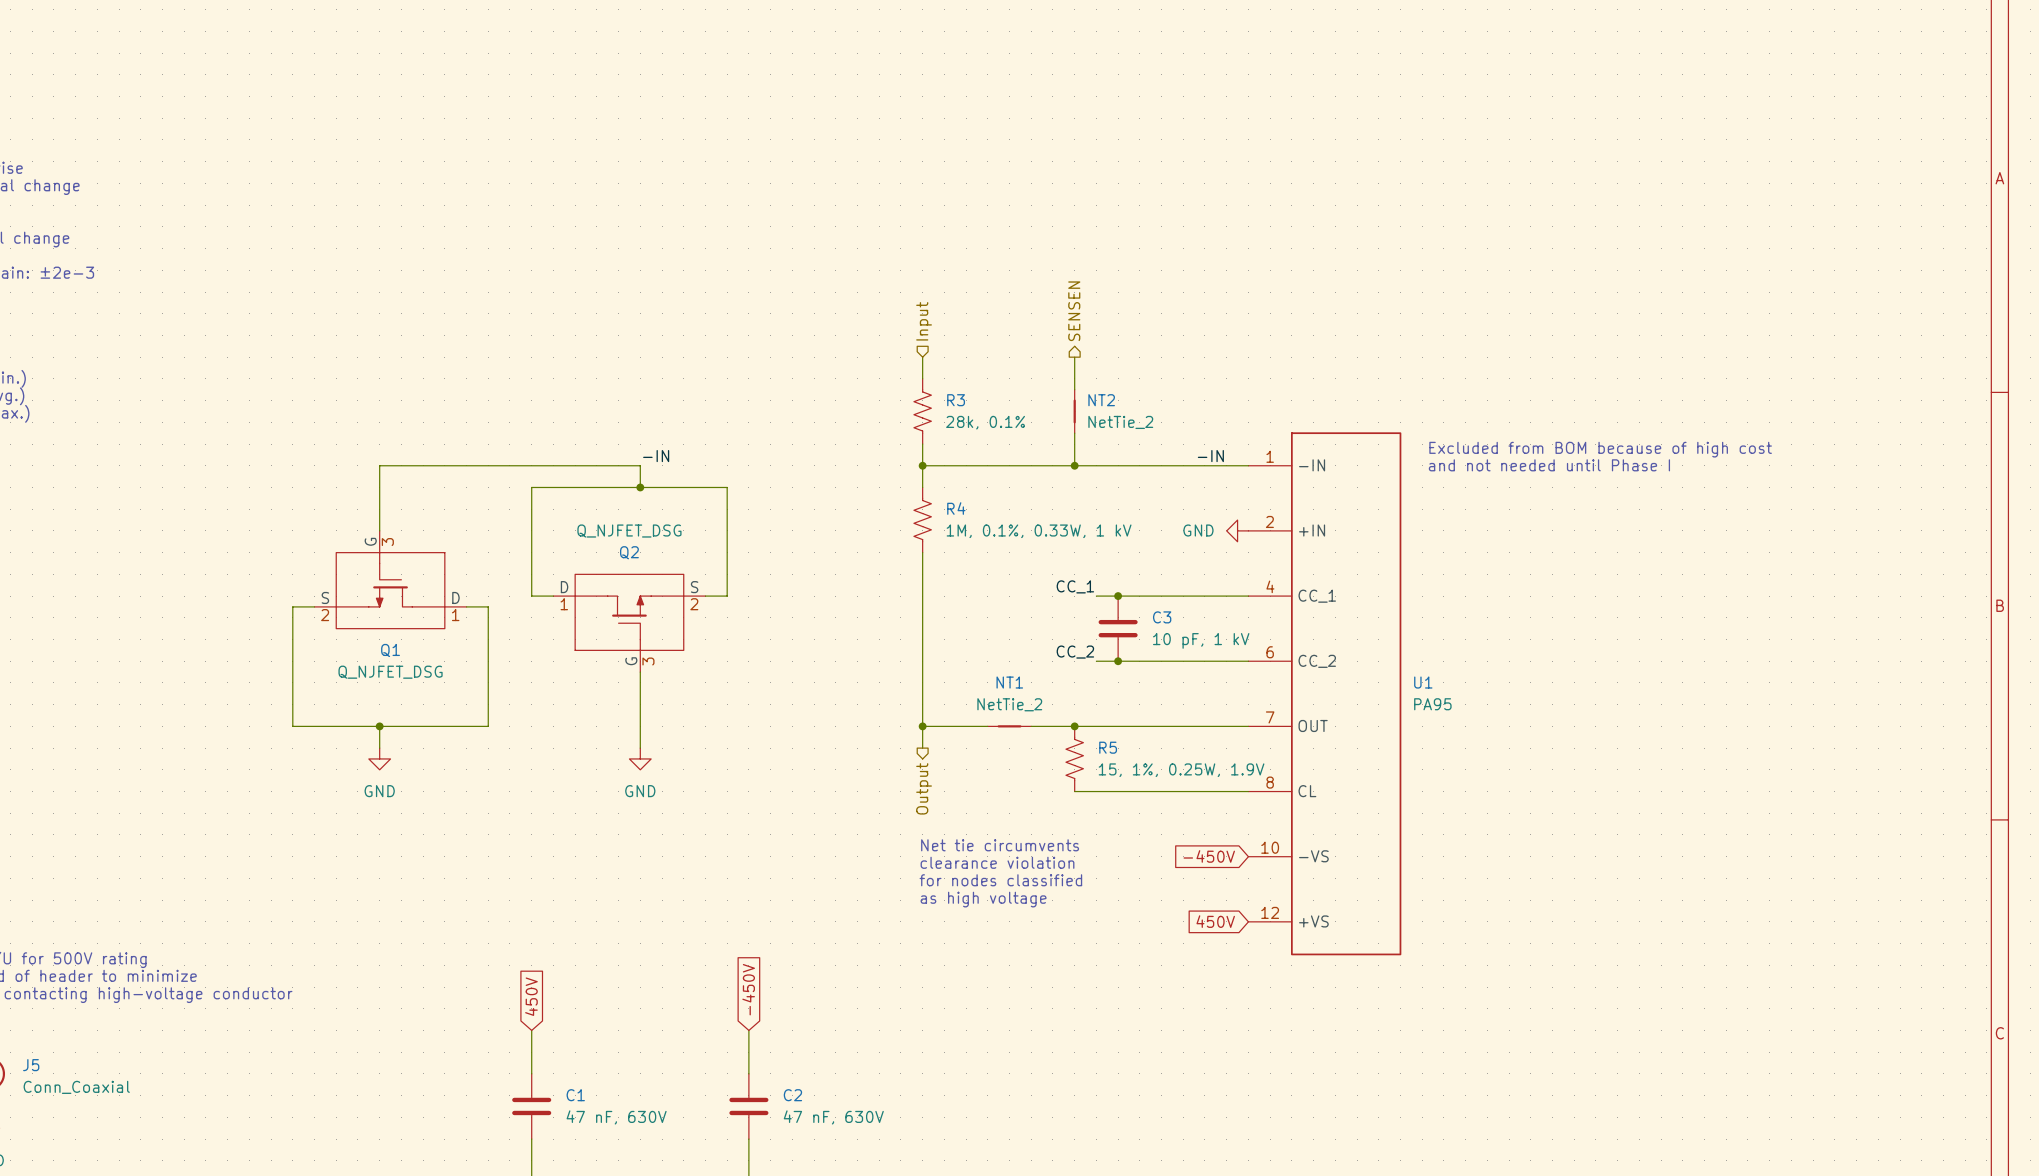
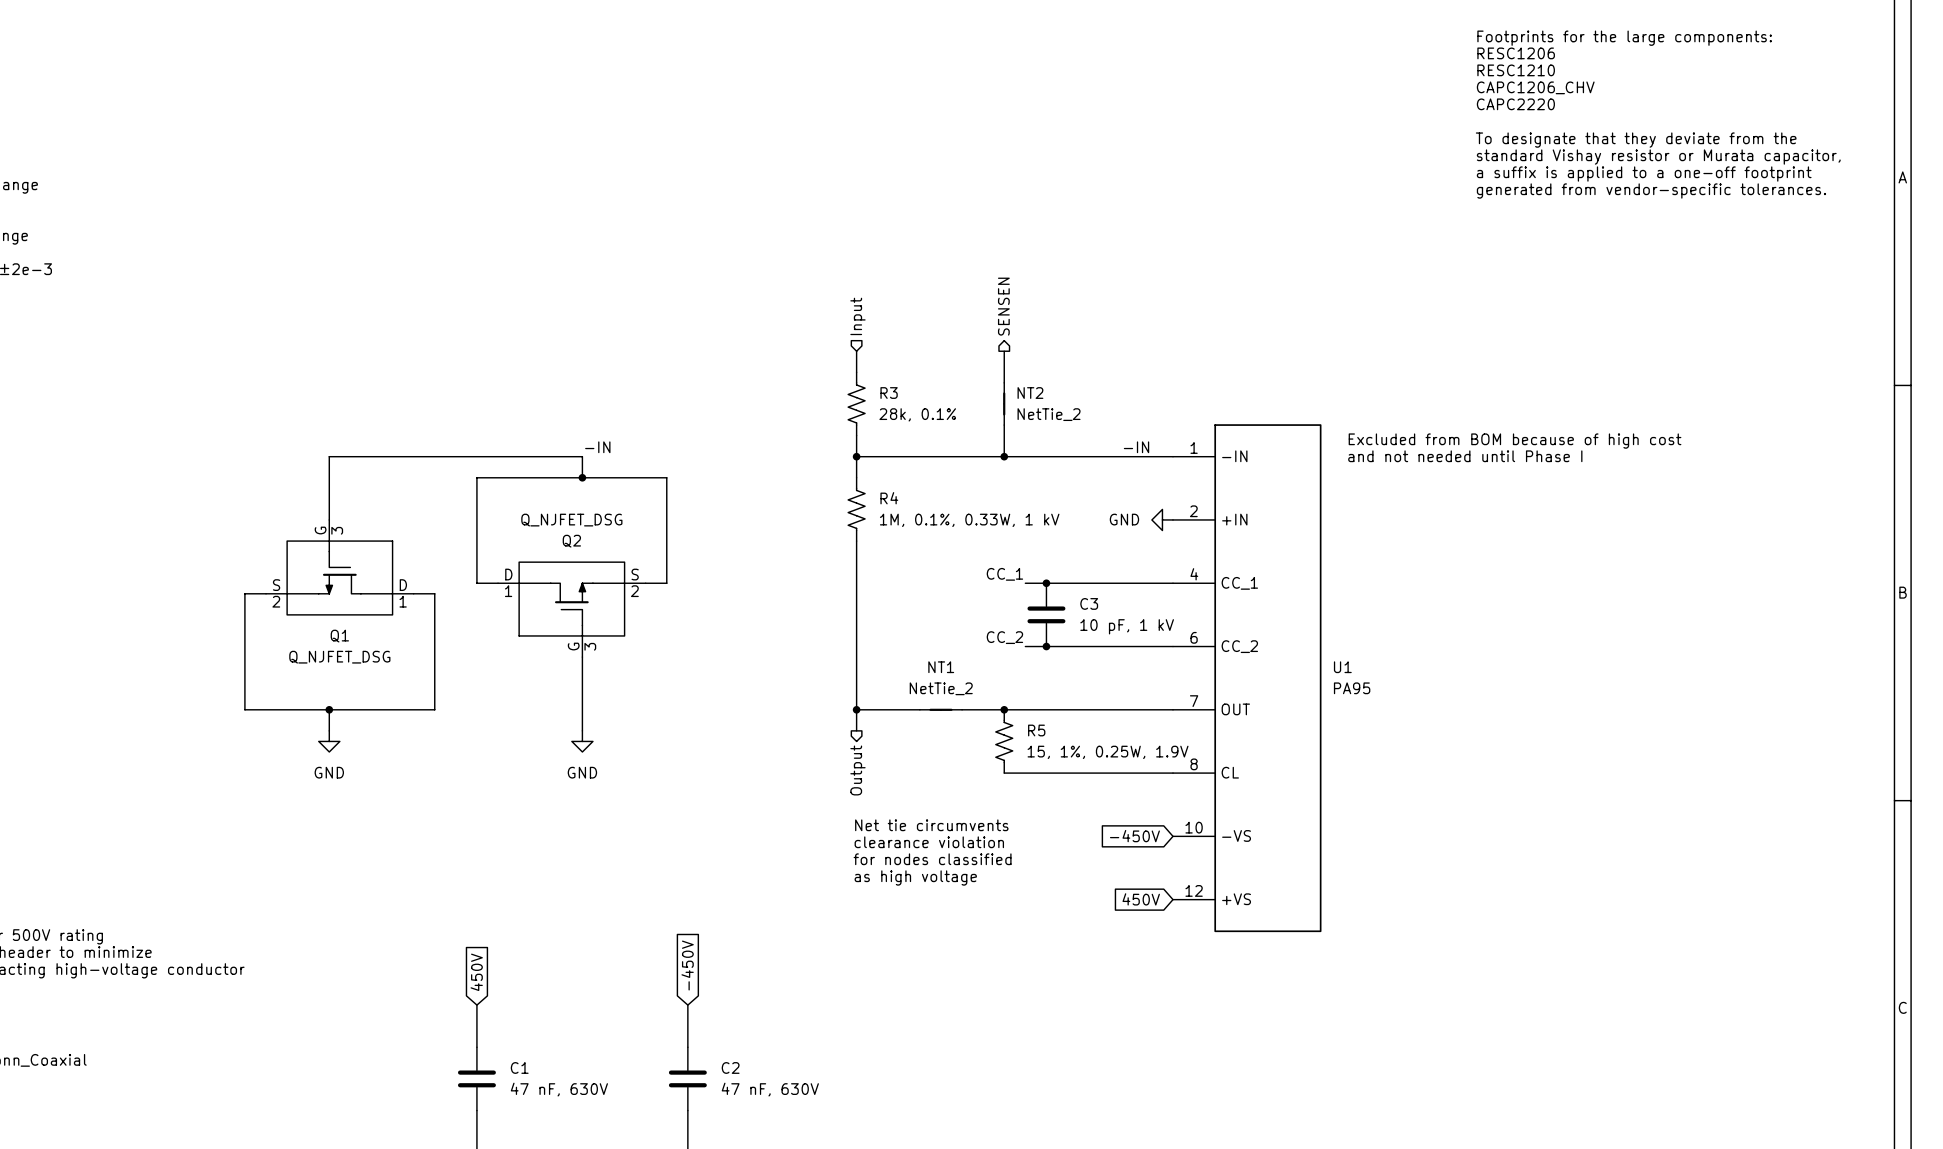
text: none -> Footprints for the large components: (1624, 38)
text: none -> RESC1206 (1516, 53)
text: none -> RESC1210 (1516, 70)
text: none -> CAPC1206_CHV (1535, 87)
text: none -> CAPC2220 (1515, 104)
text: none -> To designate that they deviate from the (1636, 140)
text: none -> standard Vishay resistor or Murata capacitor, (1658, 157)
text: none -> a suffix is applied to a one-off footprint (1644, 174)
text: none -> generated from vendor-specific tolerances. (1651, 191)

